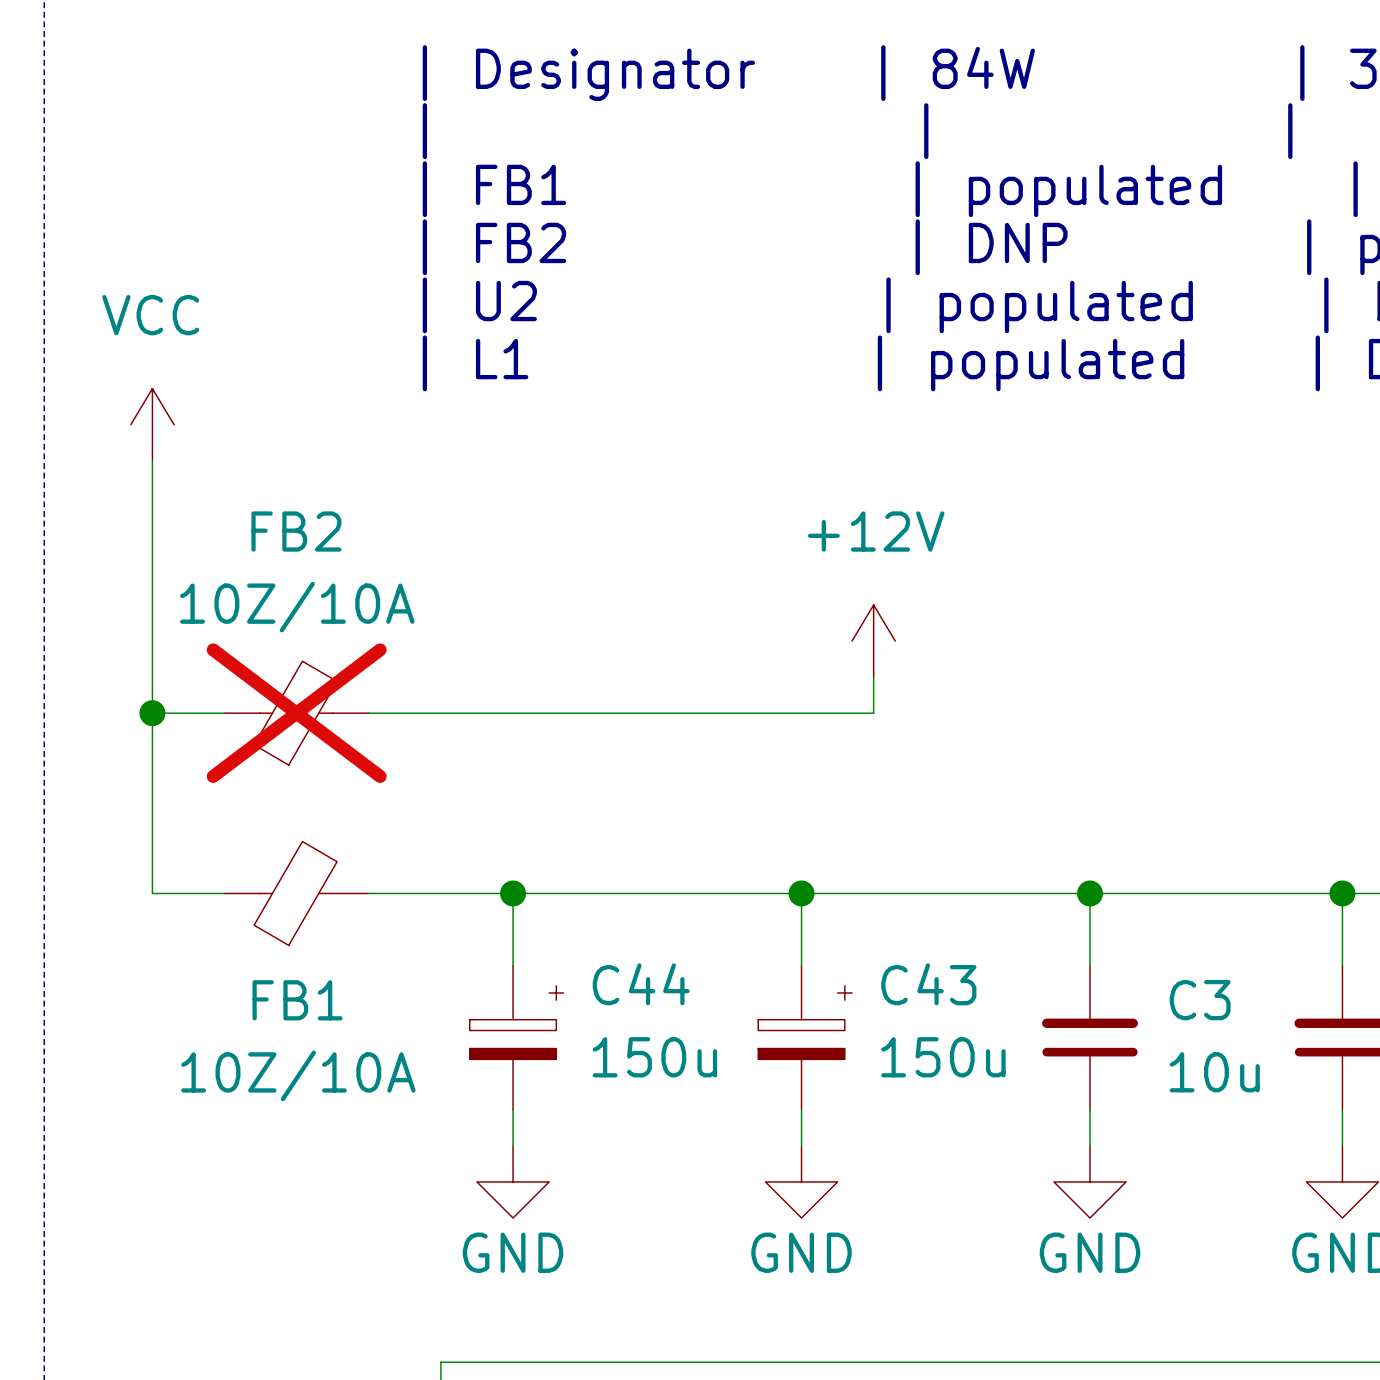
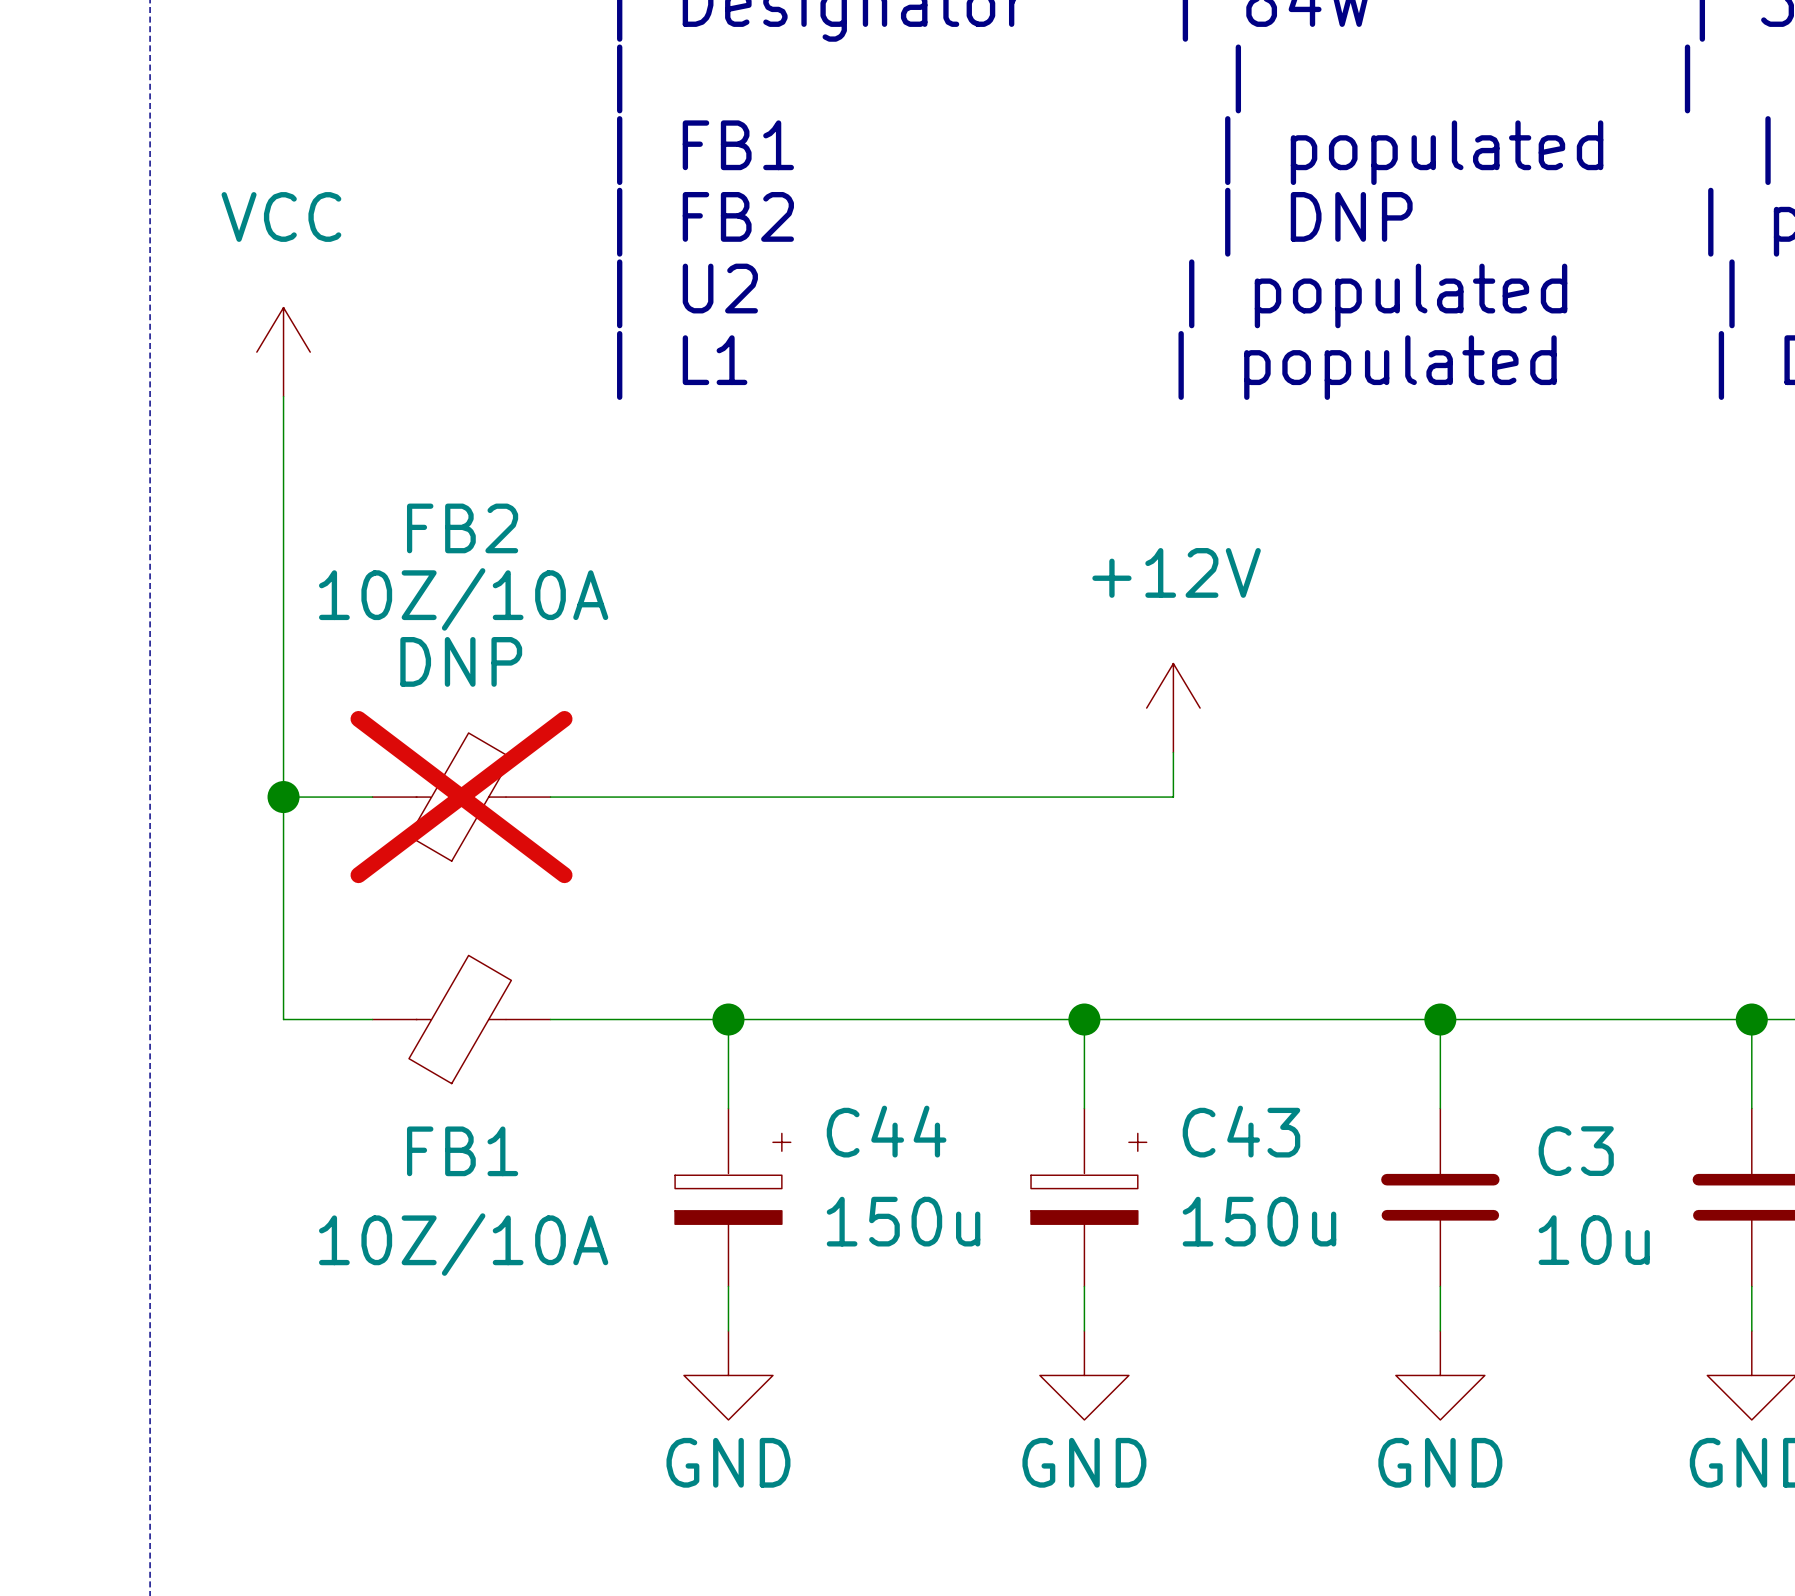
power symbol position: VCC (152, 424) -> VCC (283, 352)
FB2 name position: FB2 (296, 531) -> FB2 (462, 528)
FB2 text: none -> DNP (461, 661)
FB2 text position: 10Z/10A (297, 607) -> 10Z/10A (463, 599)

